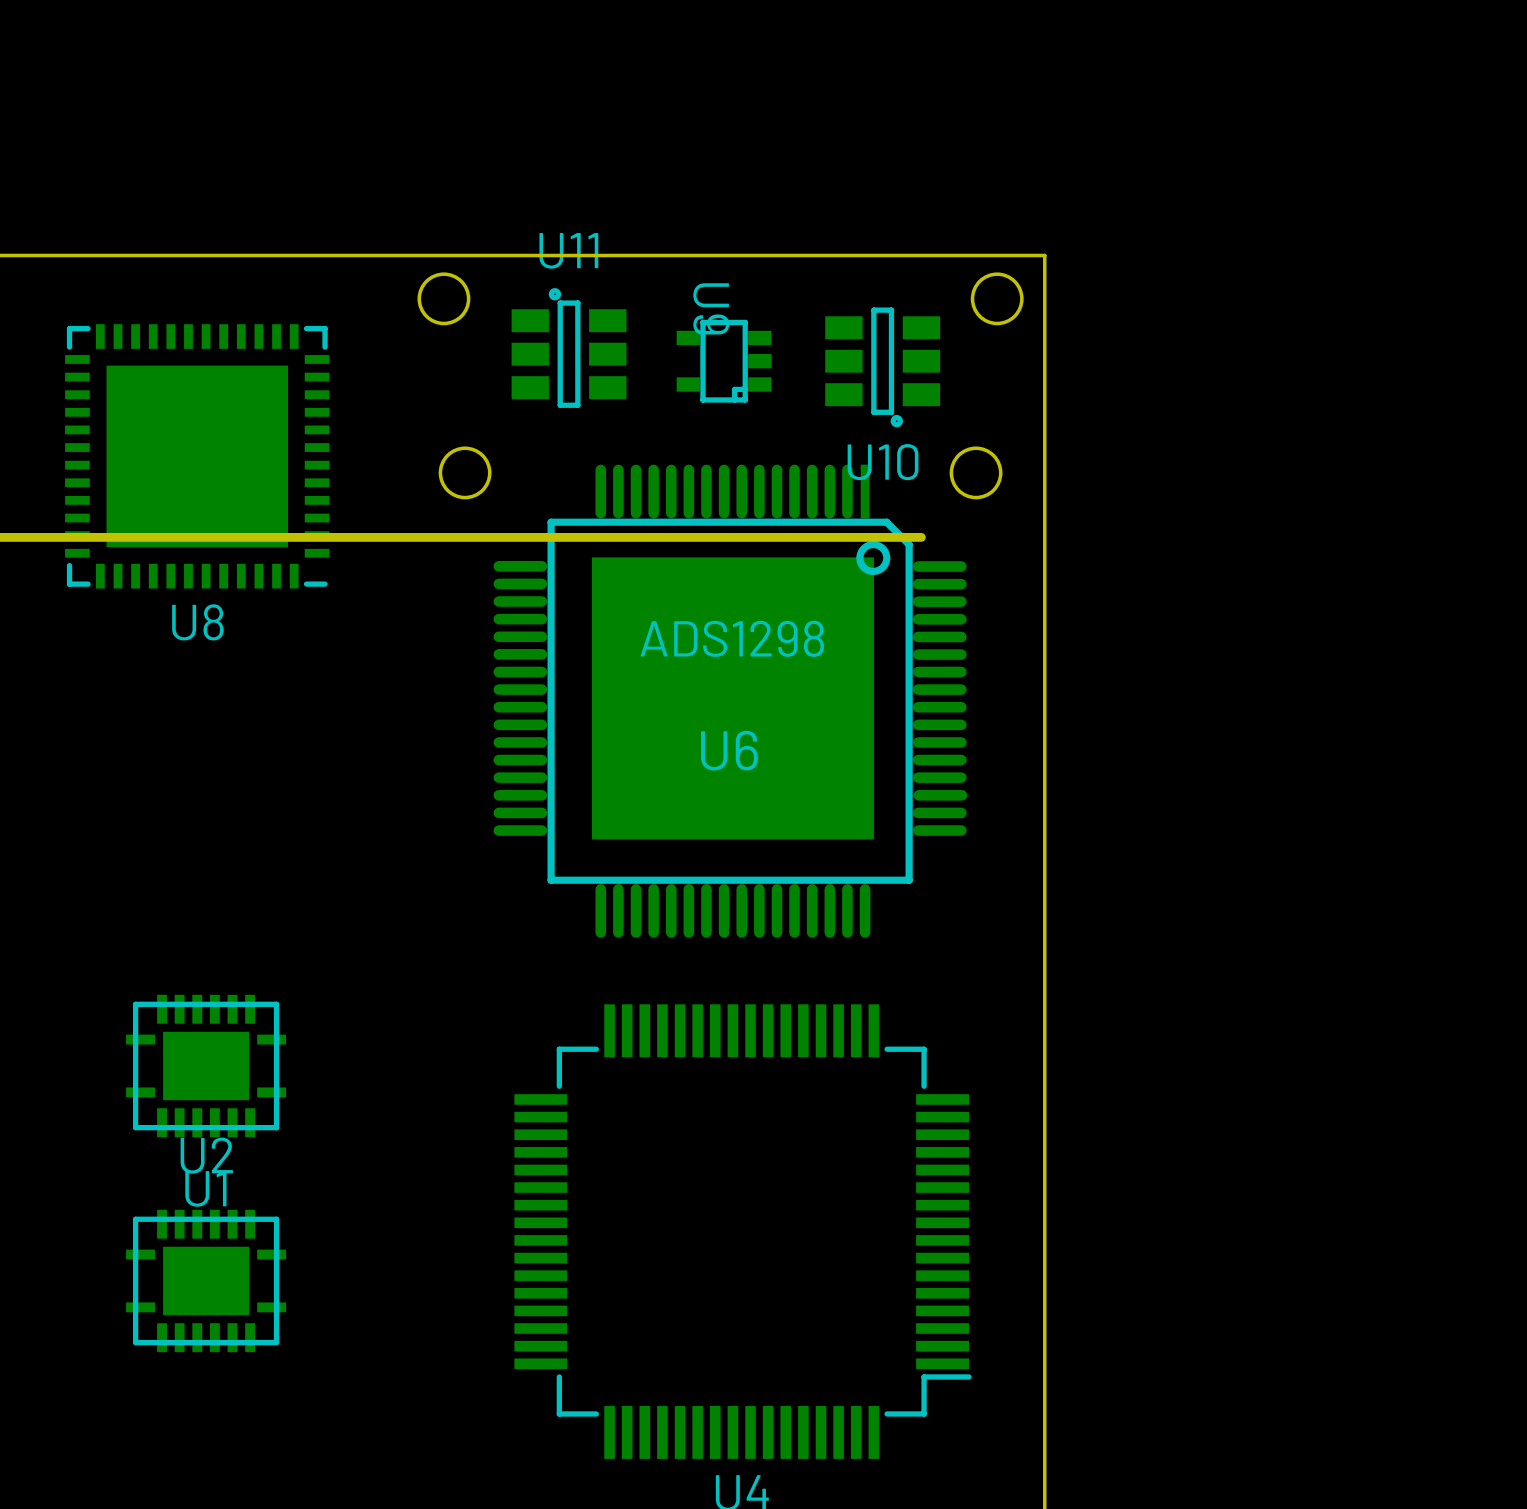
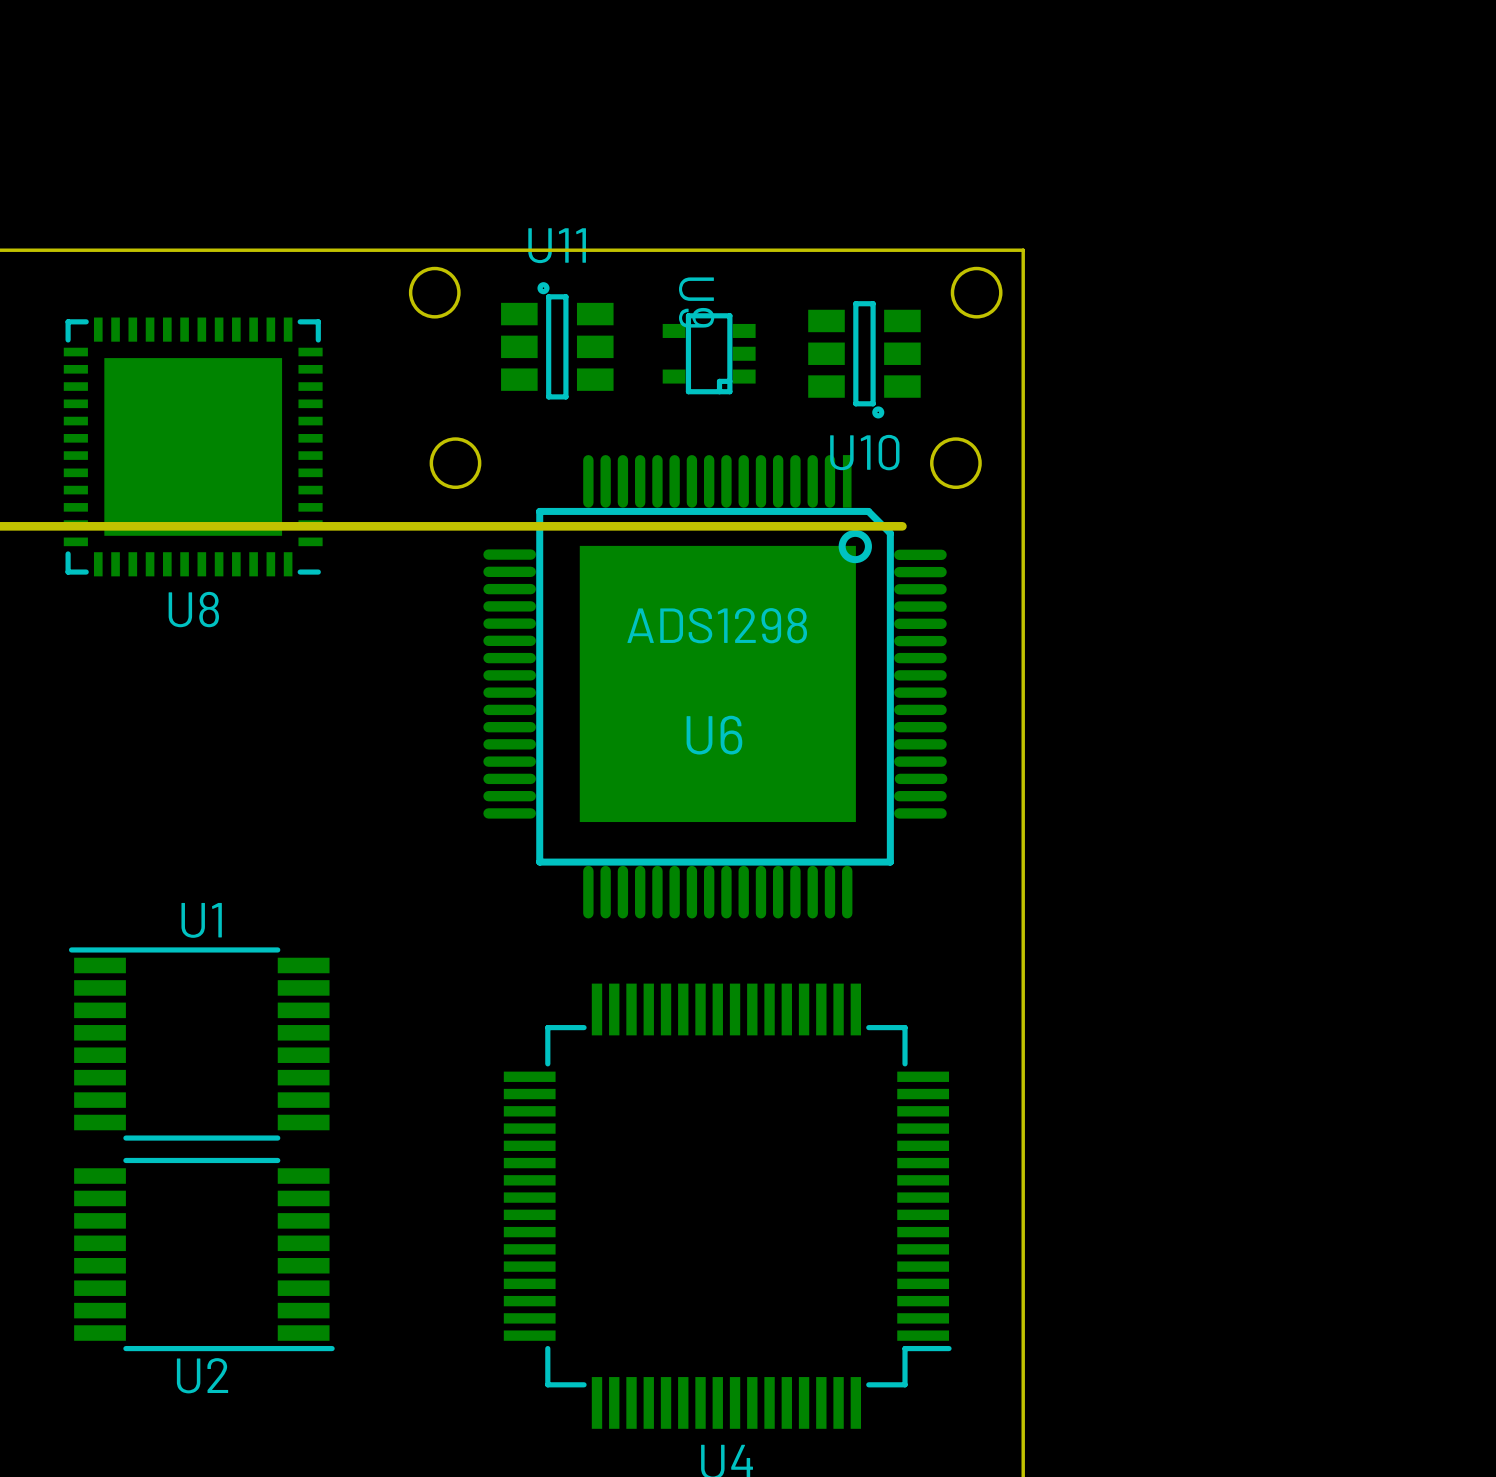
U1 footprint: [126, 994, 287, 1138] -> [68, 947, 330, 1141]
U2 name position: U2 (206, 1155) -> U2 (202, 1375)
U1 name position: U1 (205, 1188) -> U1 (201, 920)
U2 footprint: [126, 1209, 287, 1353] -> [74, 1157, 335, 1352]

